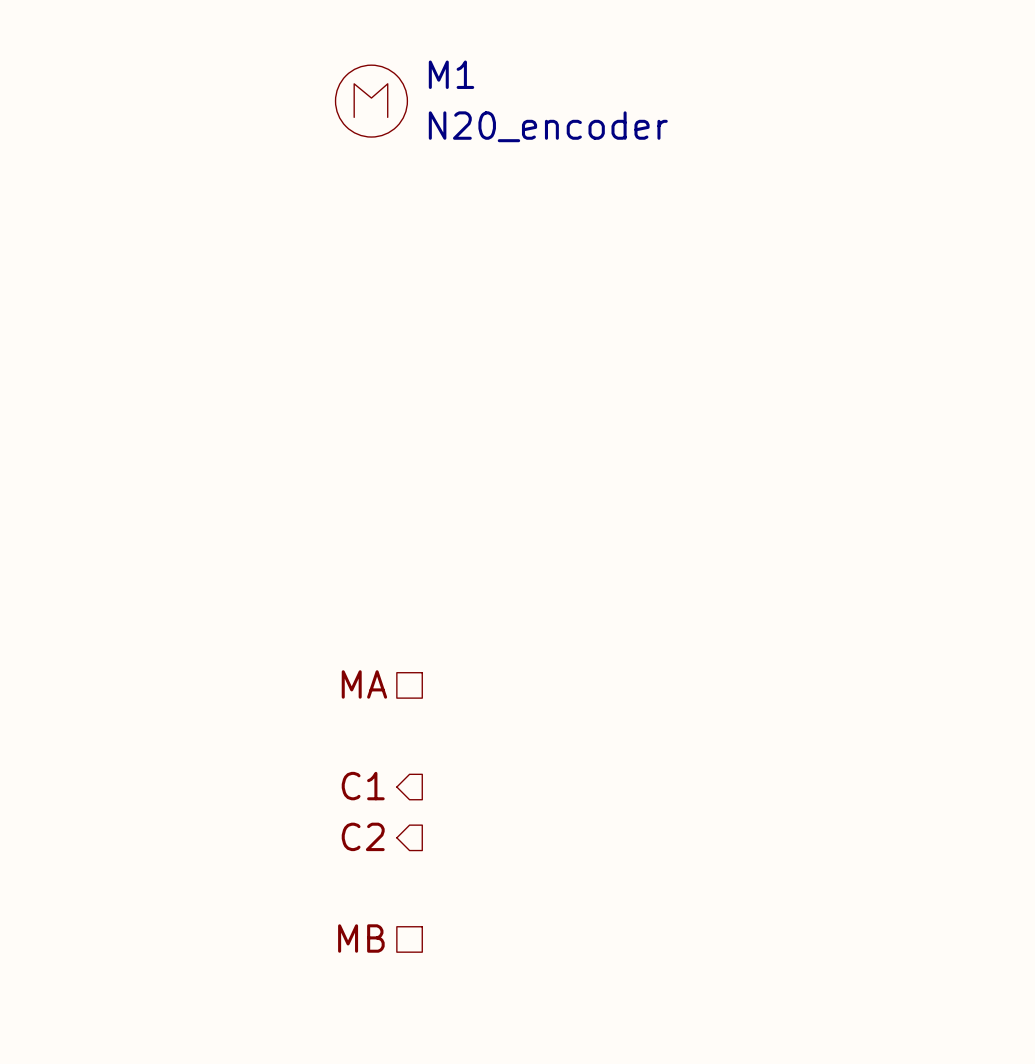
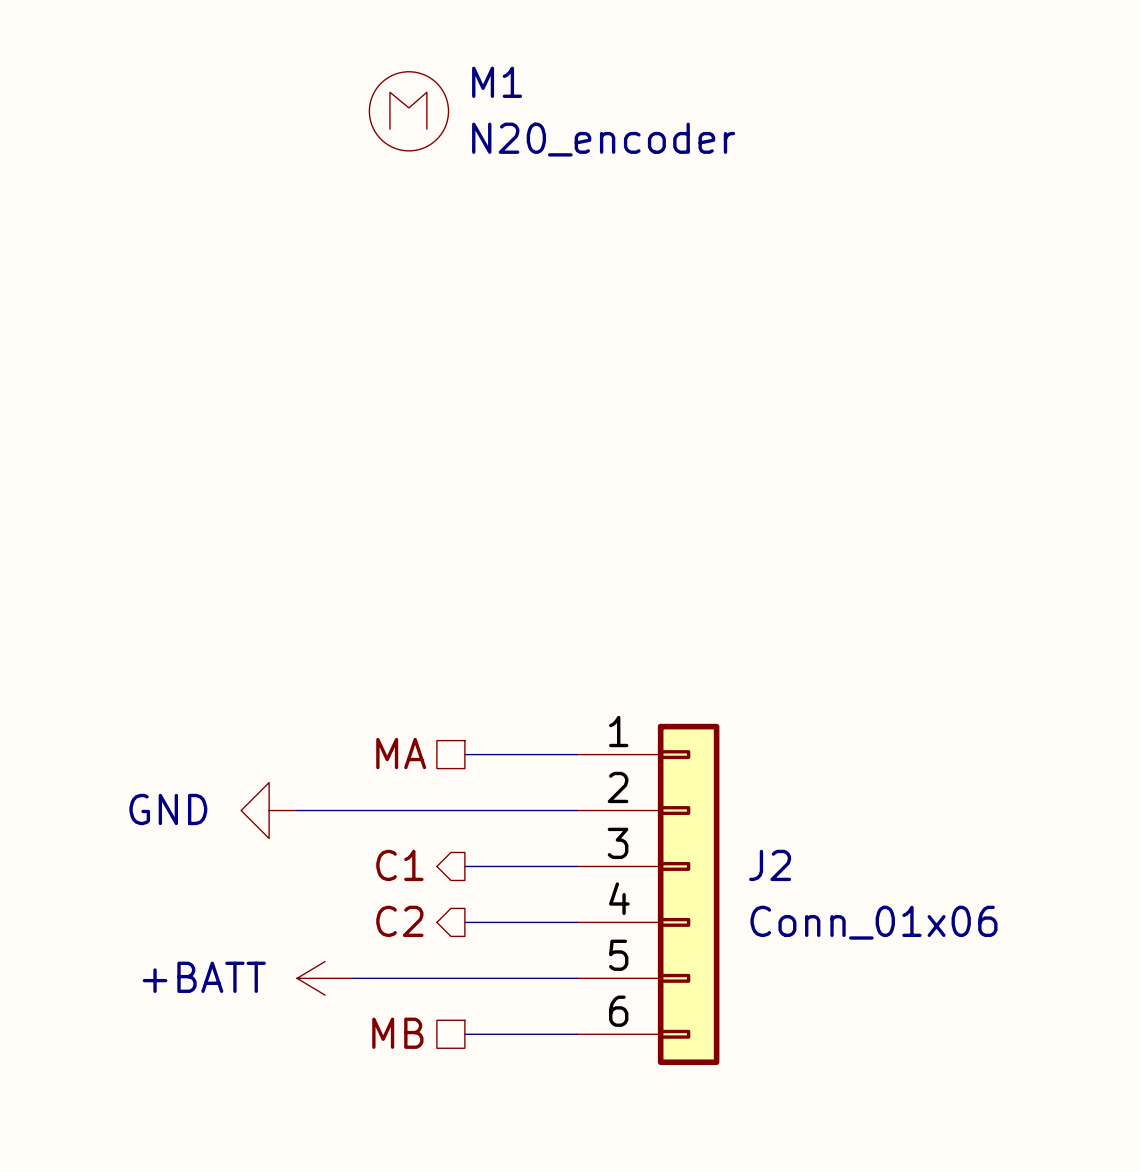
wire: none -> (464, 754) (576, 754)
power symbol: none -> GND (269, 810)
wire: none -> (297, 810) (576, 810)
wire: none -> (464, 866) (576, 866)
J2: none -> Conn_01x06 (648, 894)
wire: none -> (464, 922) (576, 922)
power symbol: none -> +BATT (325, 978)
wire: none -> (353, 978) (576, 978)
wire: none -> (464, 1034) (576, 1034)

